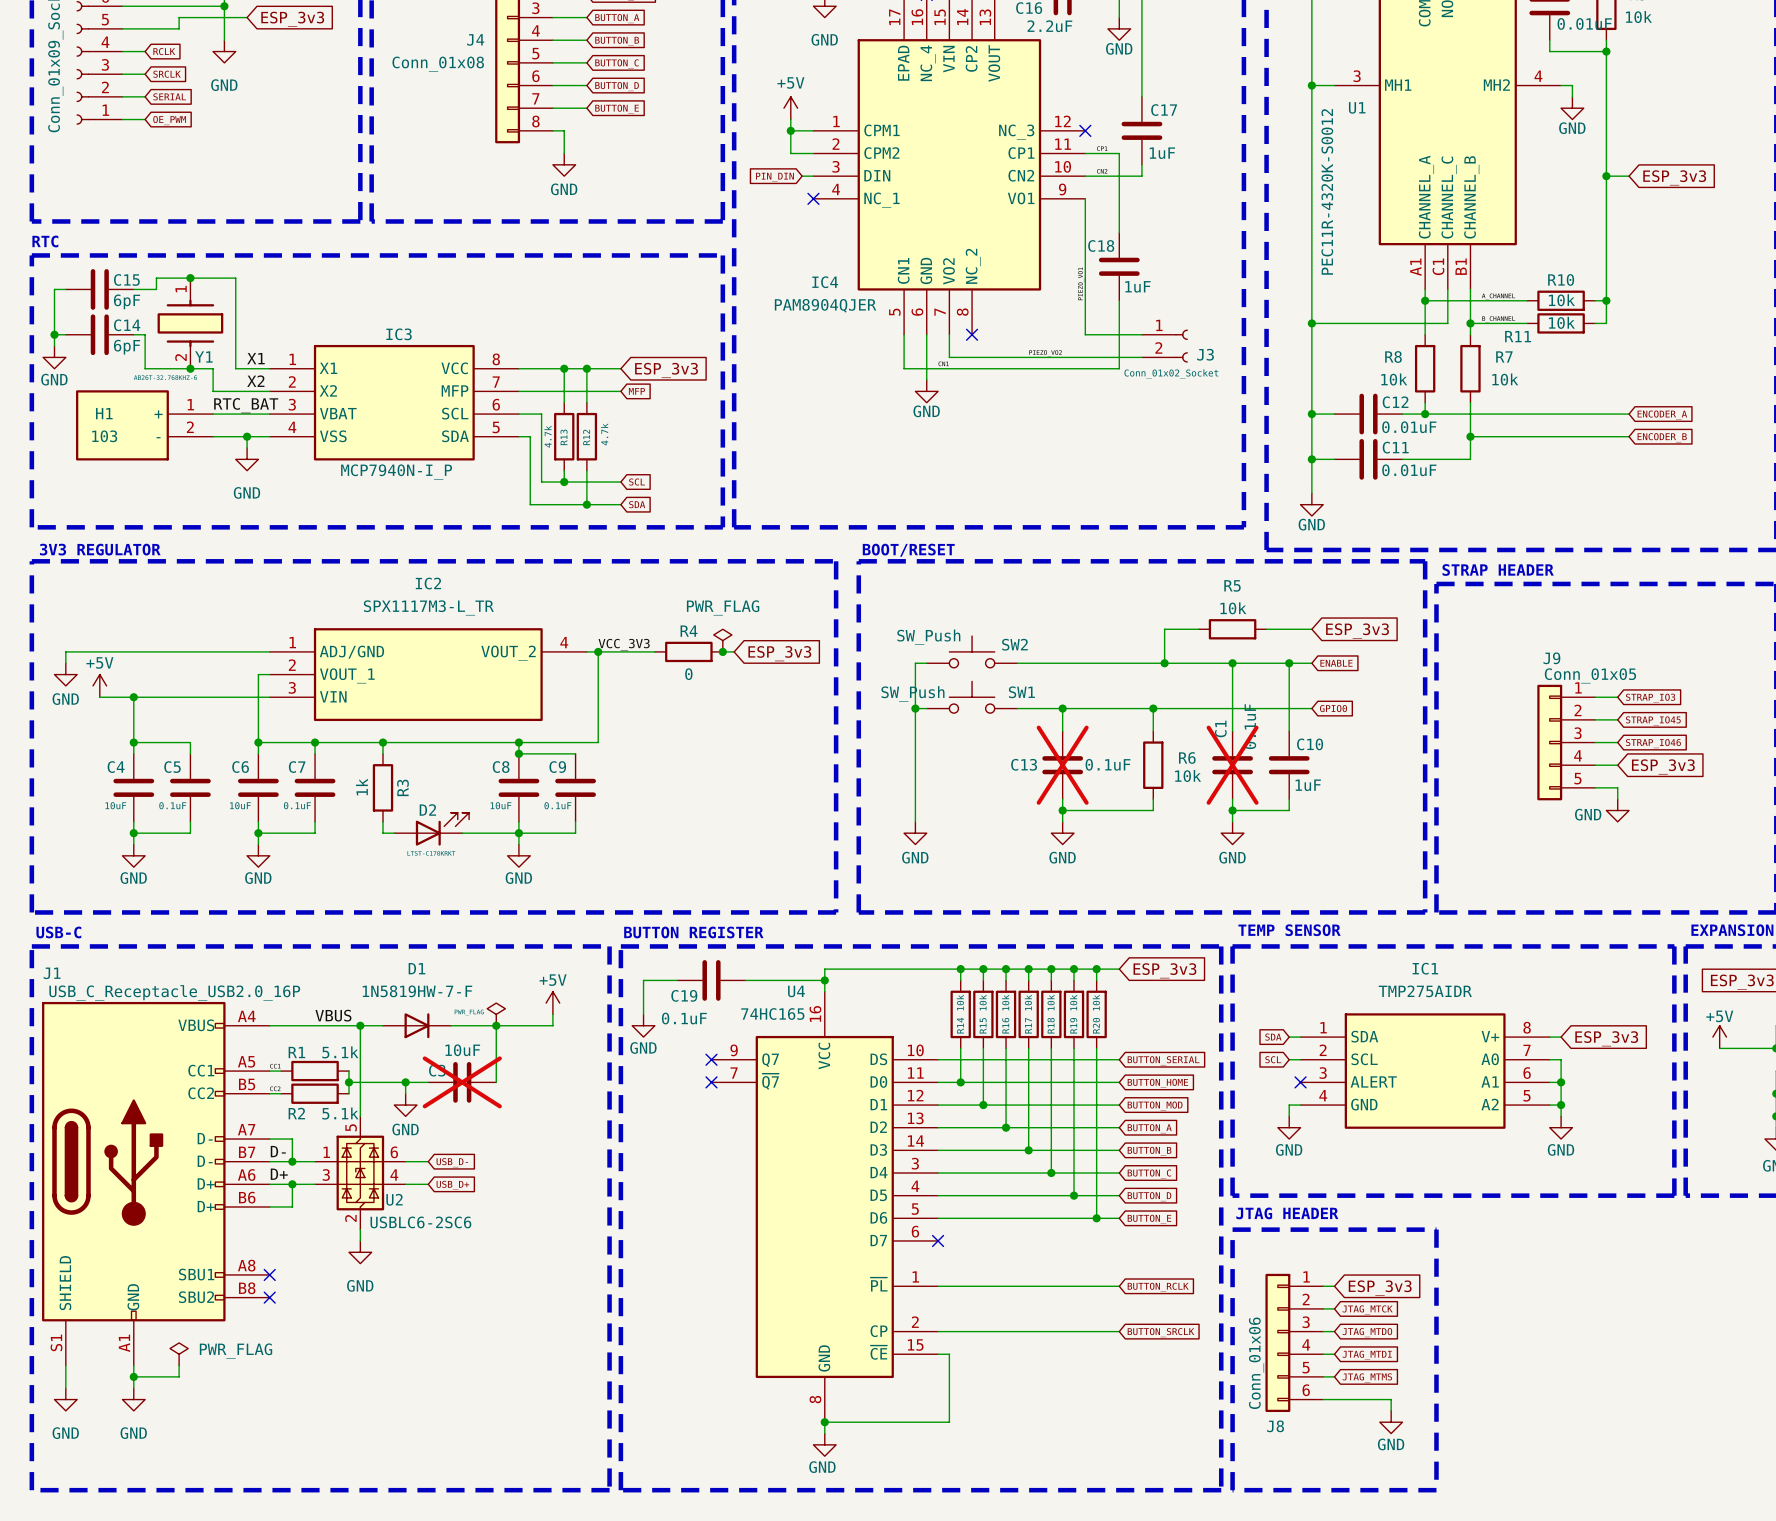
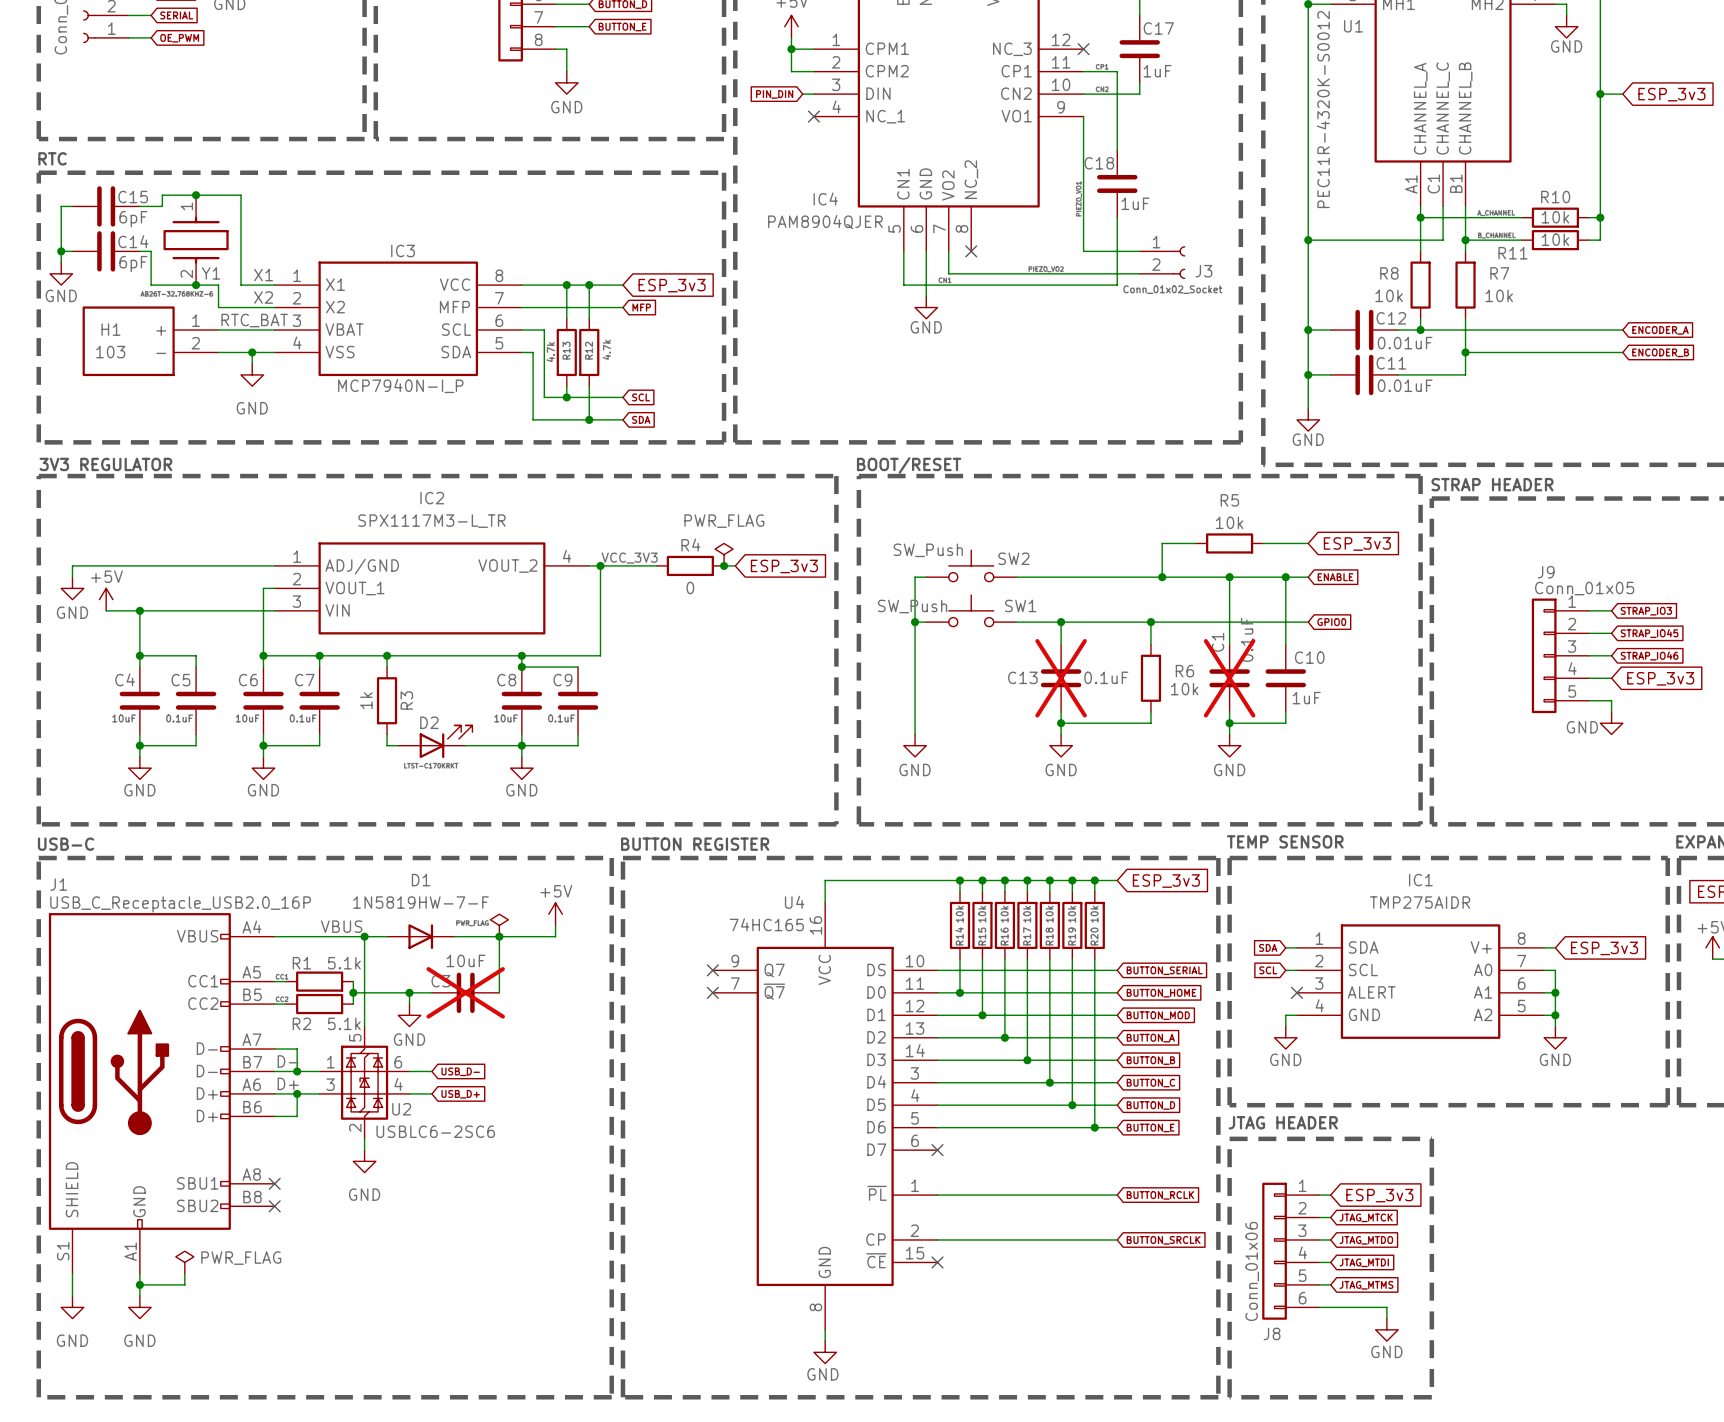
wire: (677, 980) (643, 980) (643, 1014) -> none
C19: 0.1uF (711, 980) -> none
wire: (745, 980) (824, 980) -> none
junction: (824, 980) -> none
power symbol: GND (643, 1025) -> none
wire: (938, 1354) (949, 1354) (949, 1422) (824, 1422) -> none
no-connect mark: none -> (937, 1262)
junction: (824, 1422) -> none

